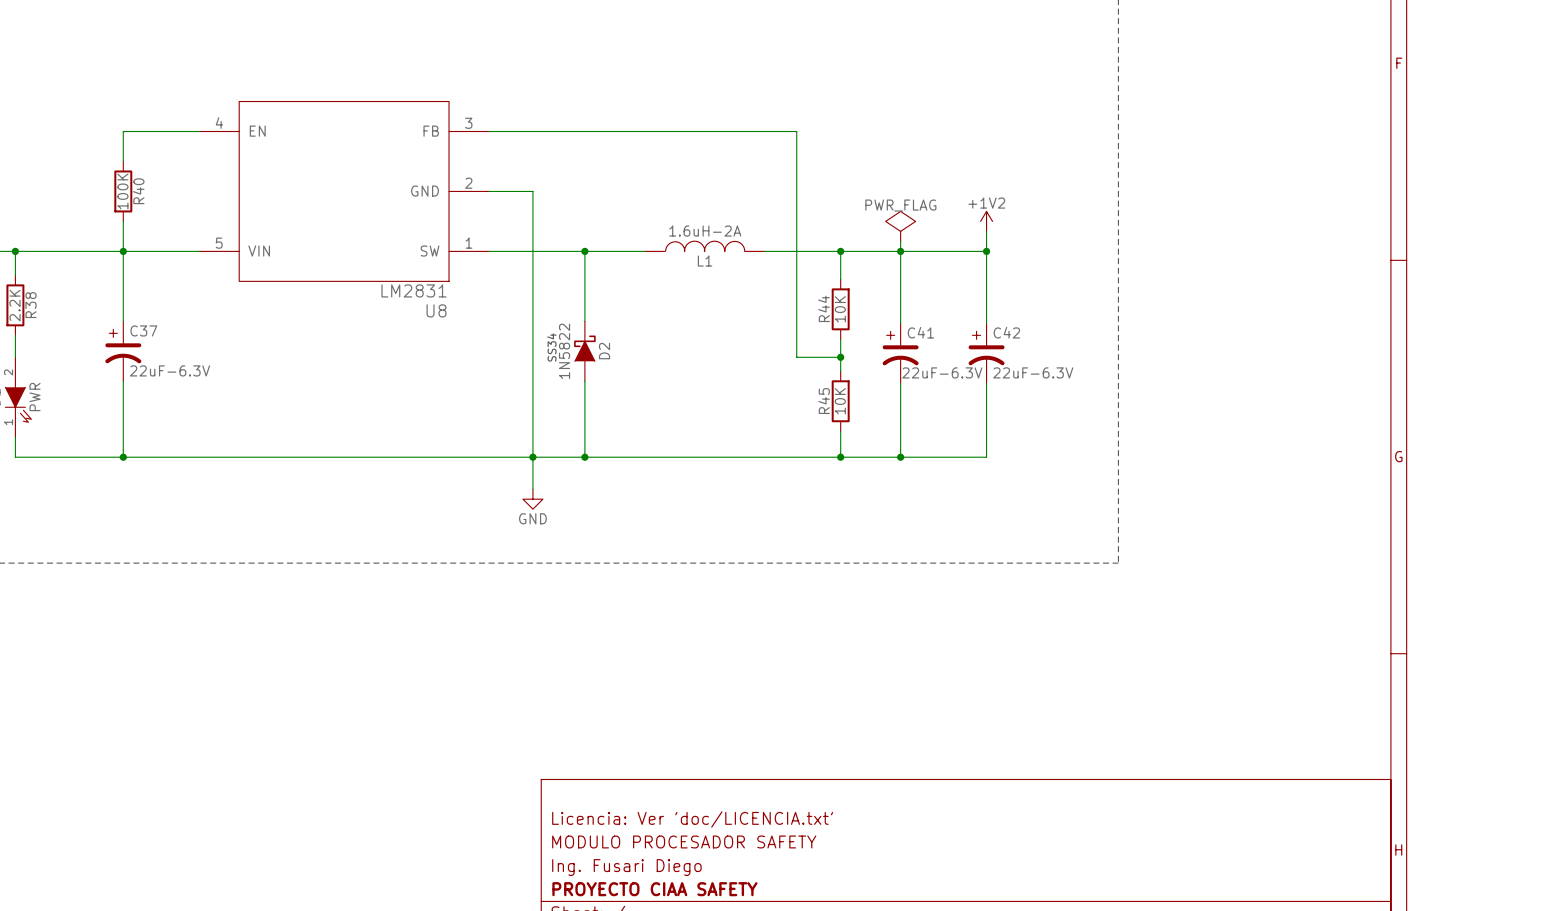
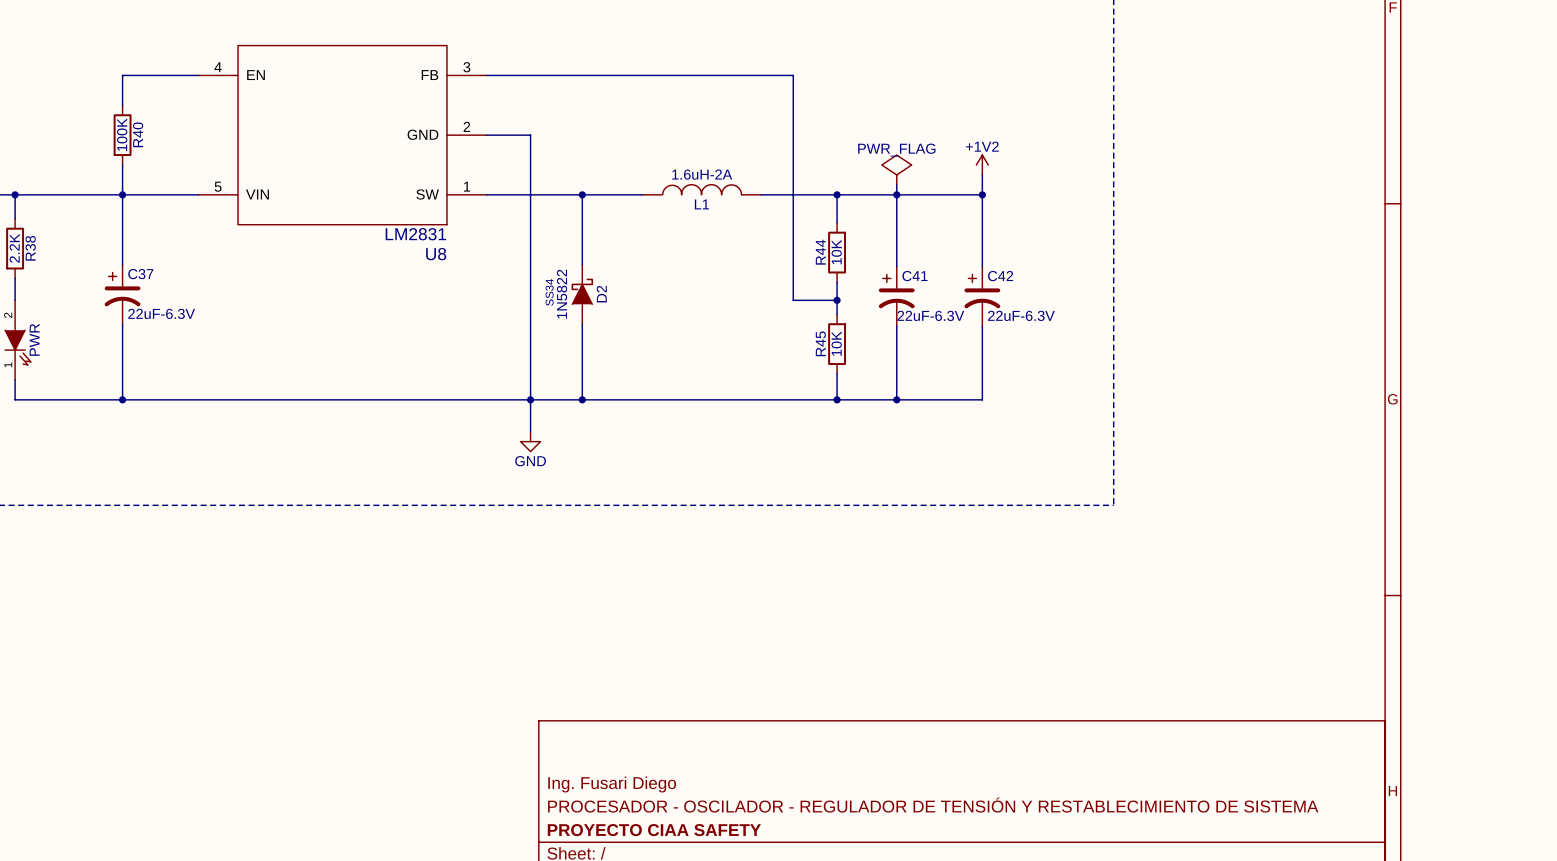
title block: Licencia: Ver 'doc/LICENCIA.txt' (692, 819) -> none
title block: MODULO PROCESADOR SAFETY (684, 841) -> Ing. Fusari Diego (612, 784)
title block: Ing. Fusari Diego (626, 867) -> PROCESADOR - OSCILADOR - REGULADOR DE TENSIÓN Y RESTABLECIMIENTO DE SISTEMA (933, 805)

